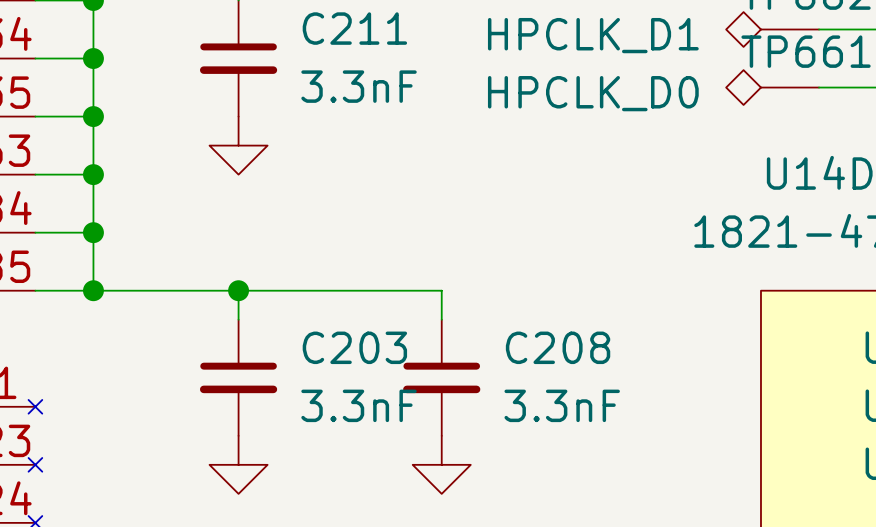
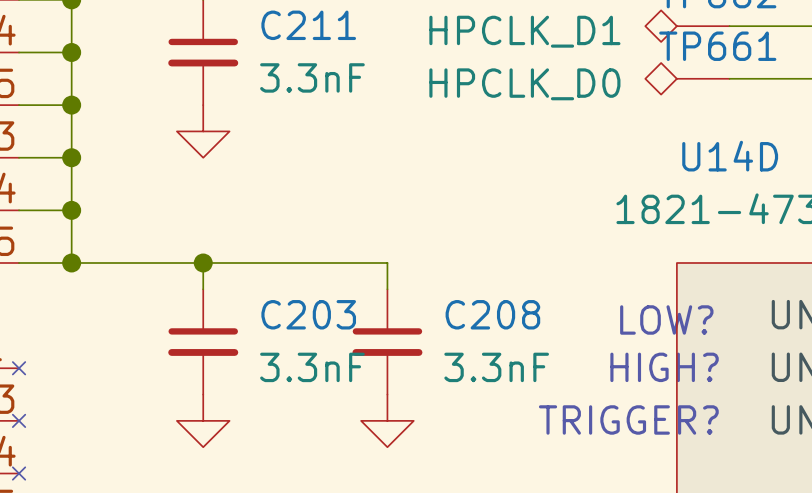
text: none -> LOW? (666, 319)
text: none -> HIGH? (664, 367)
text: none -> TRIGGER? (628, 419)

